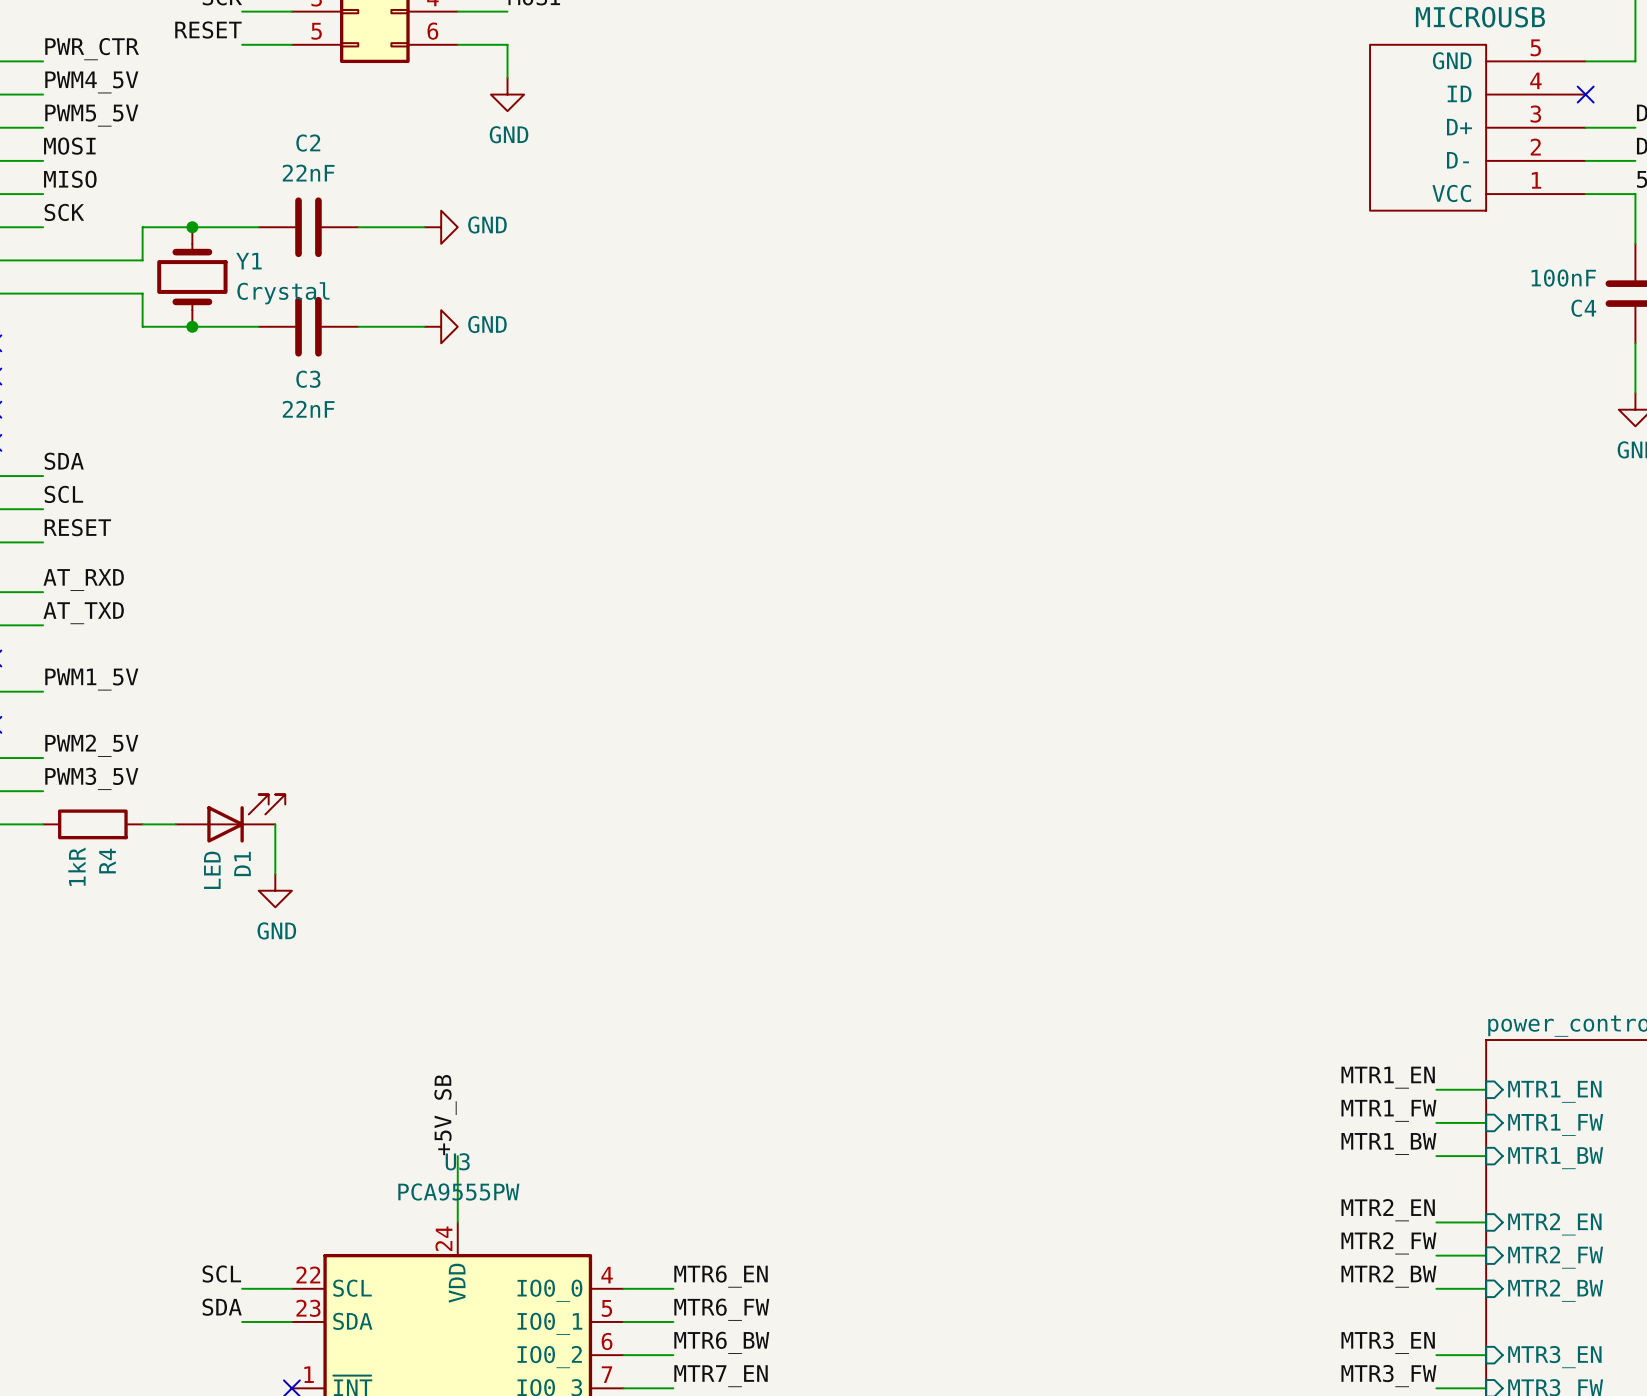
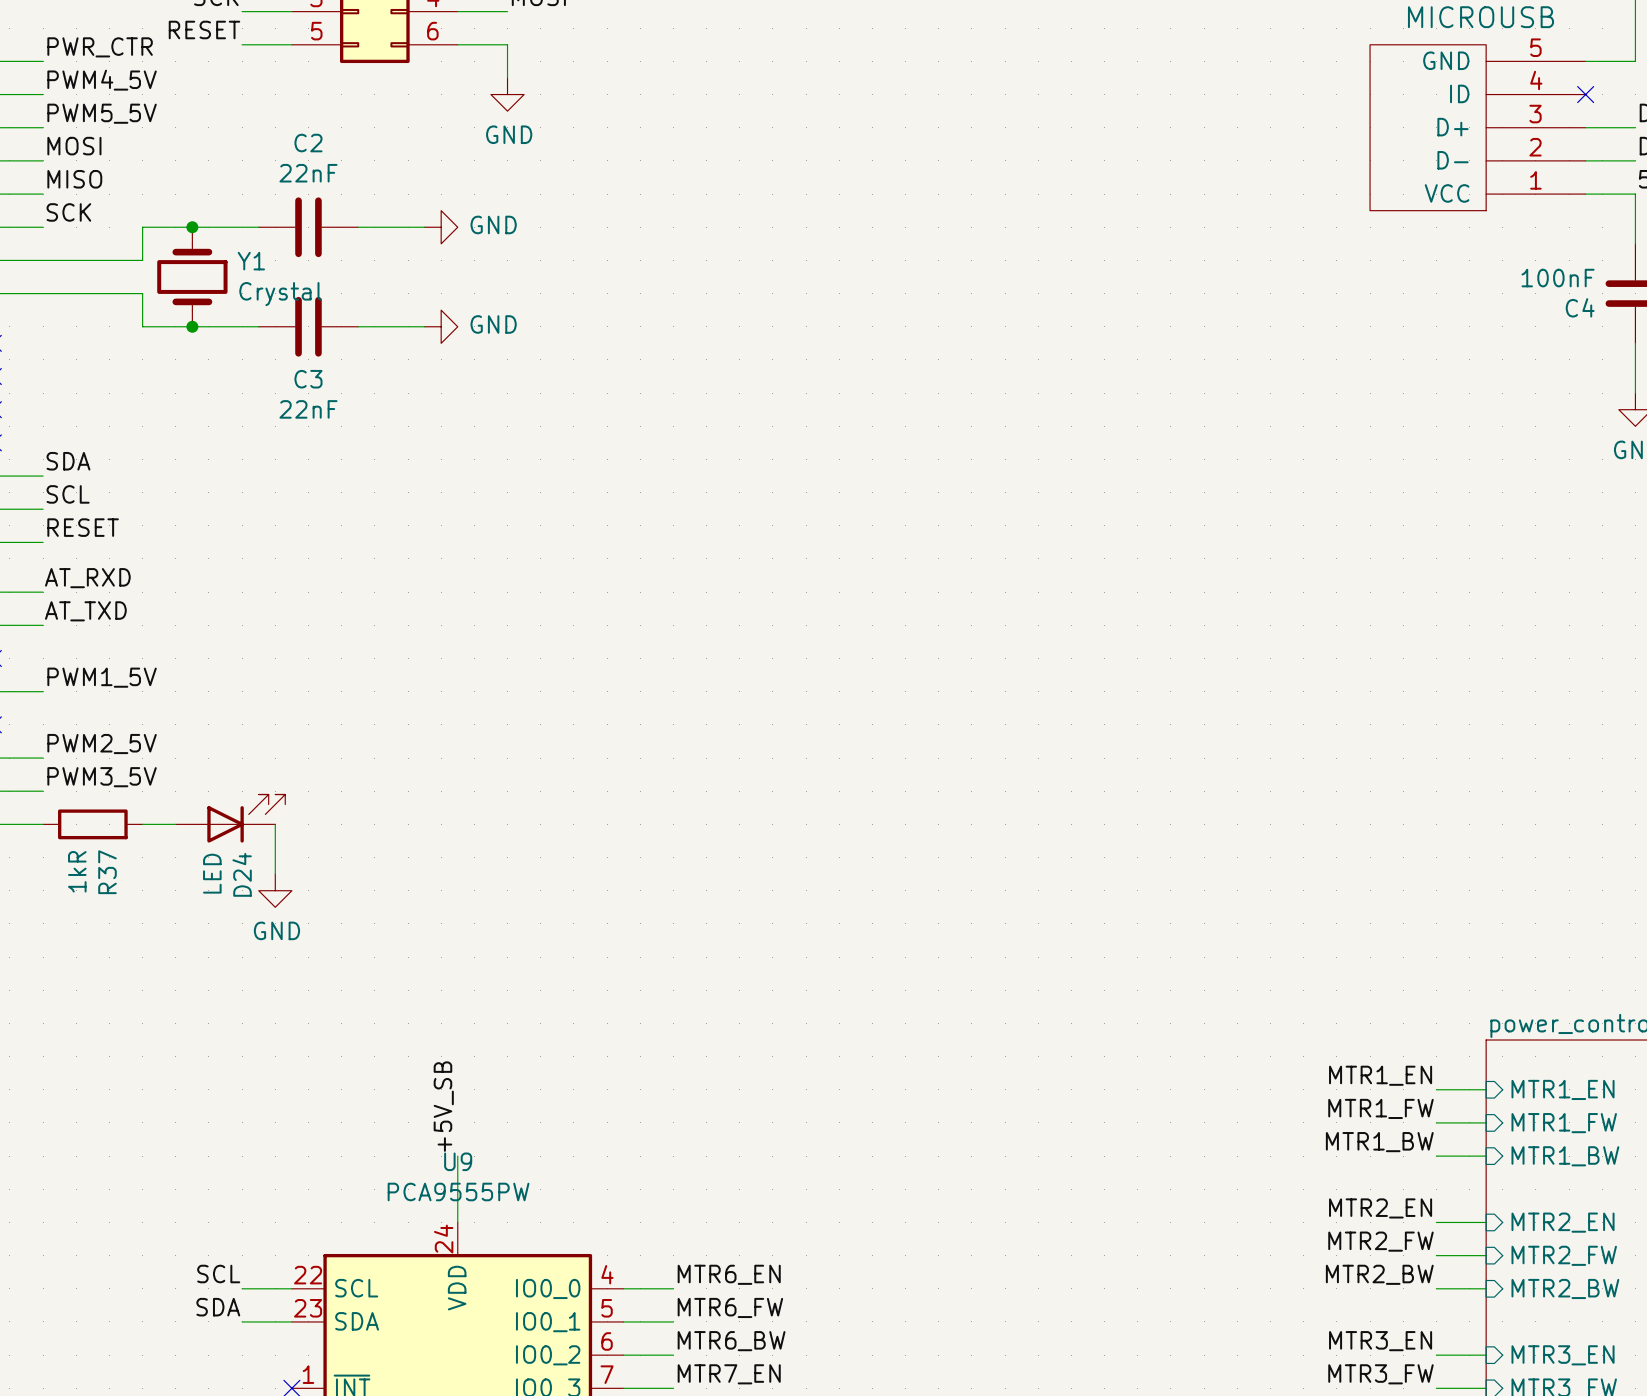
R4 name: R4 (107, 861) -> R37 (107, 872)
D1 name: D1 (242, 863) -> D24 (242, 874)
U3 name: U3 (457, 1161) -> U9 (458, 1161)

